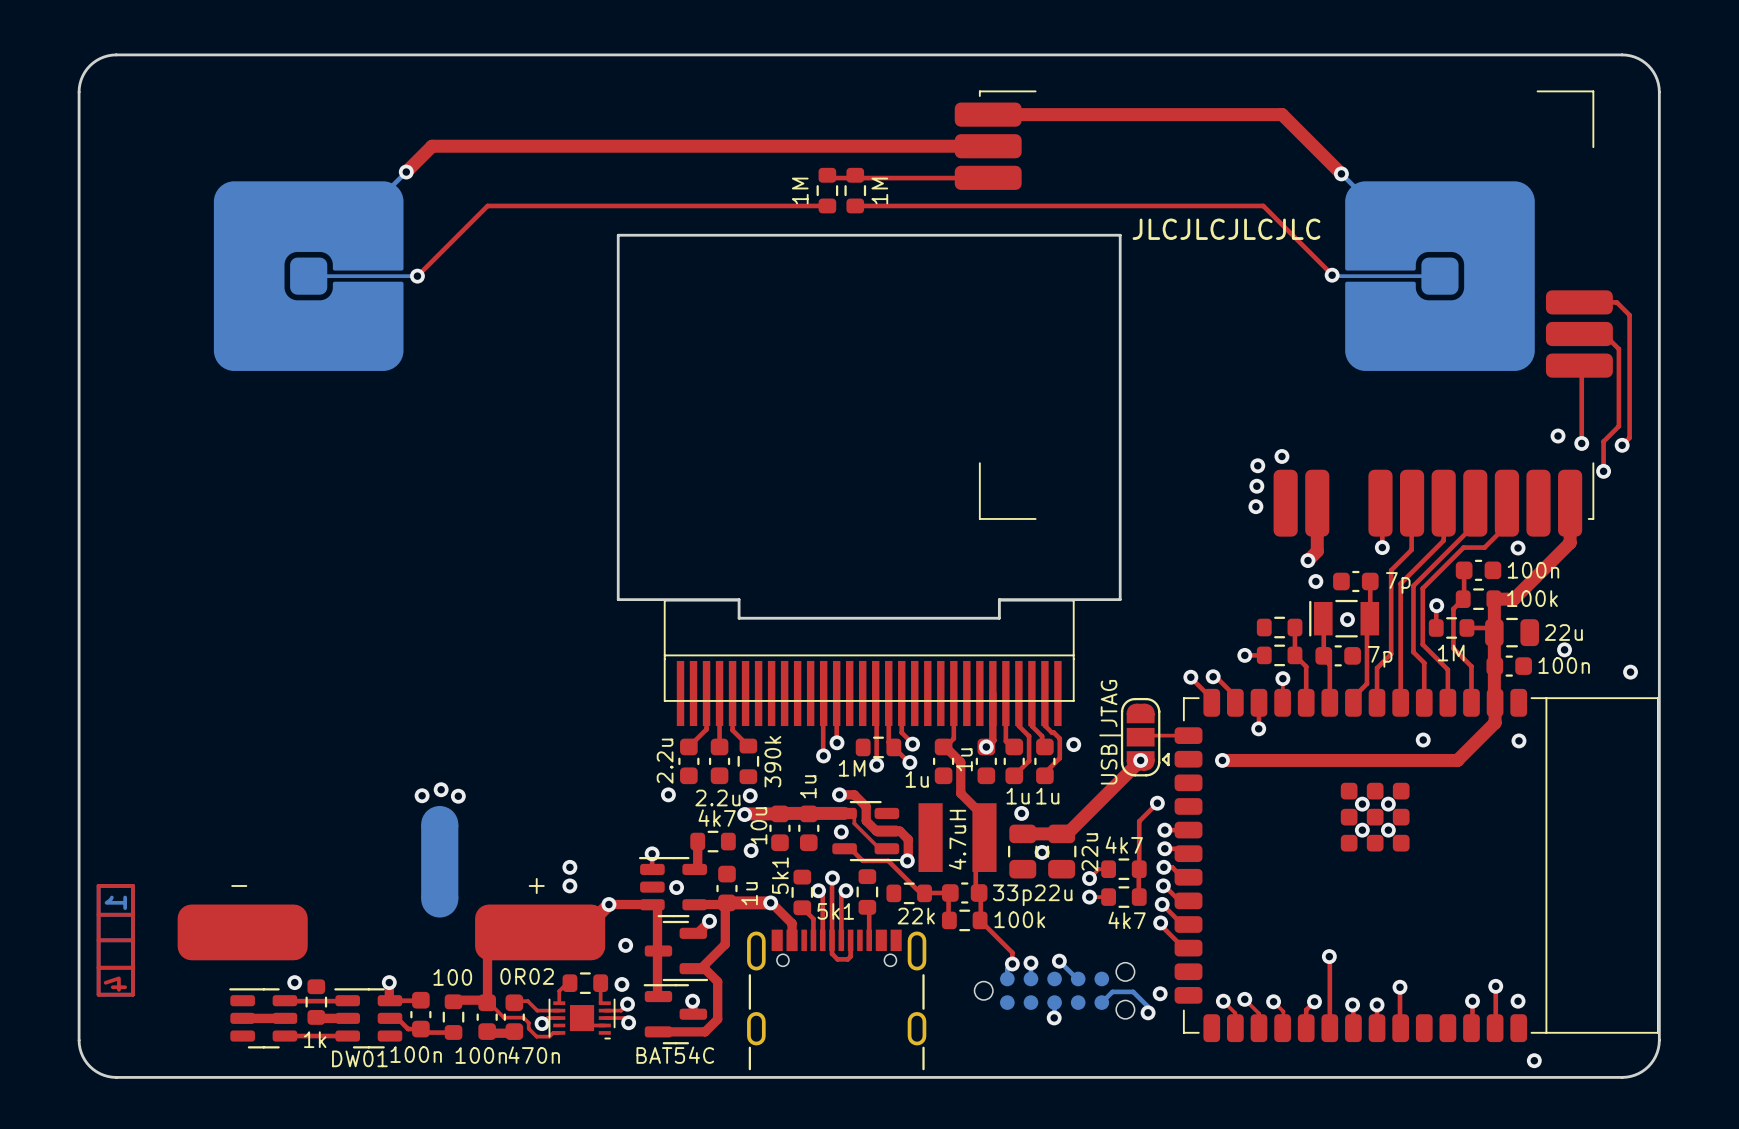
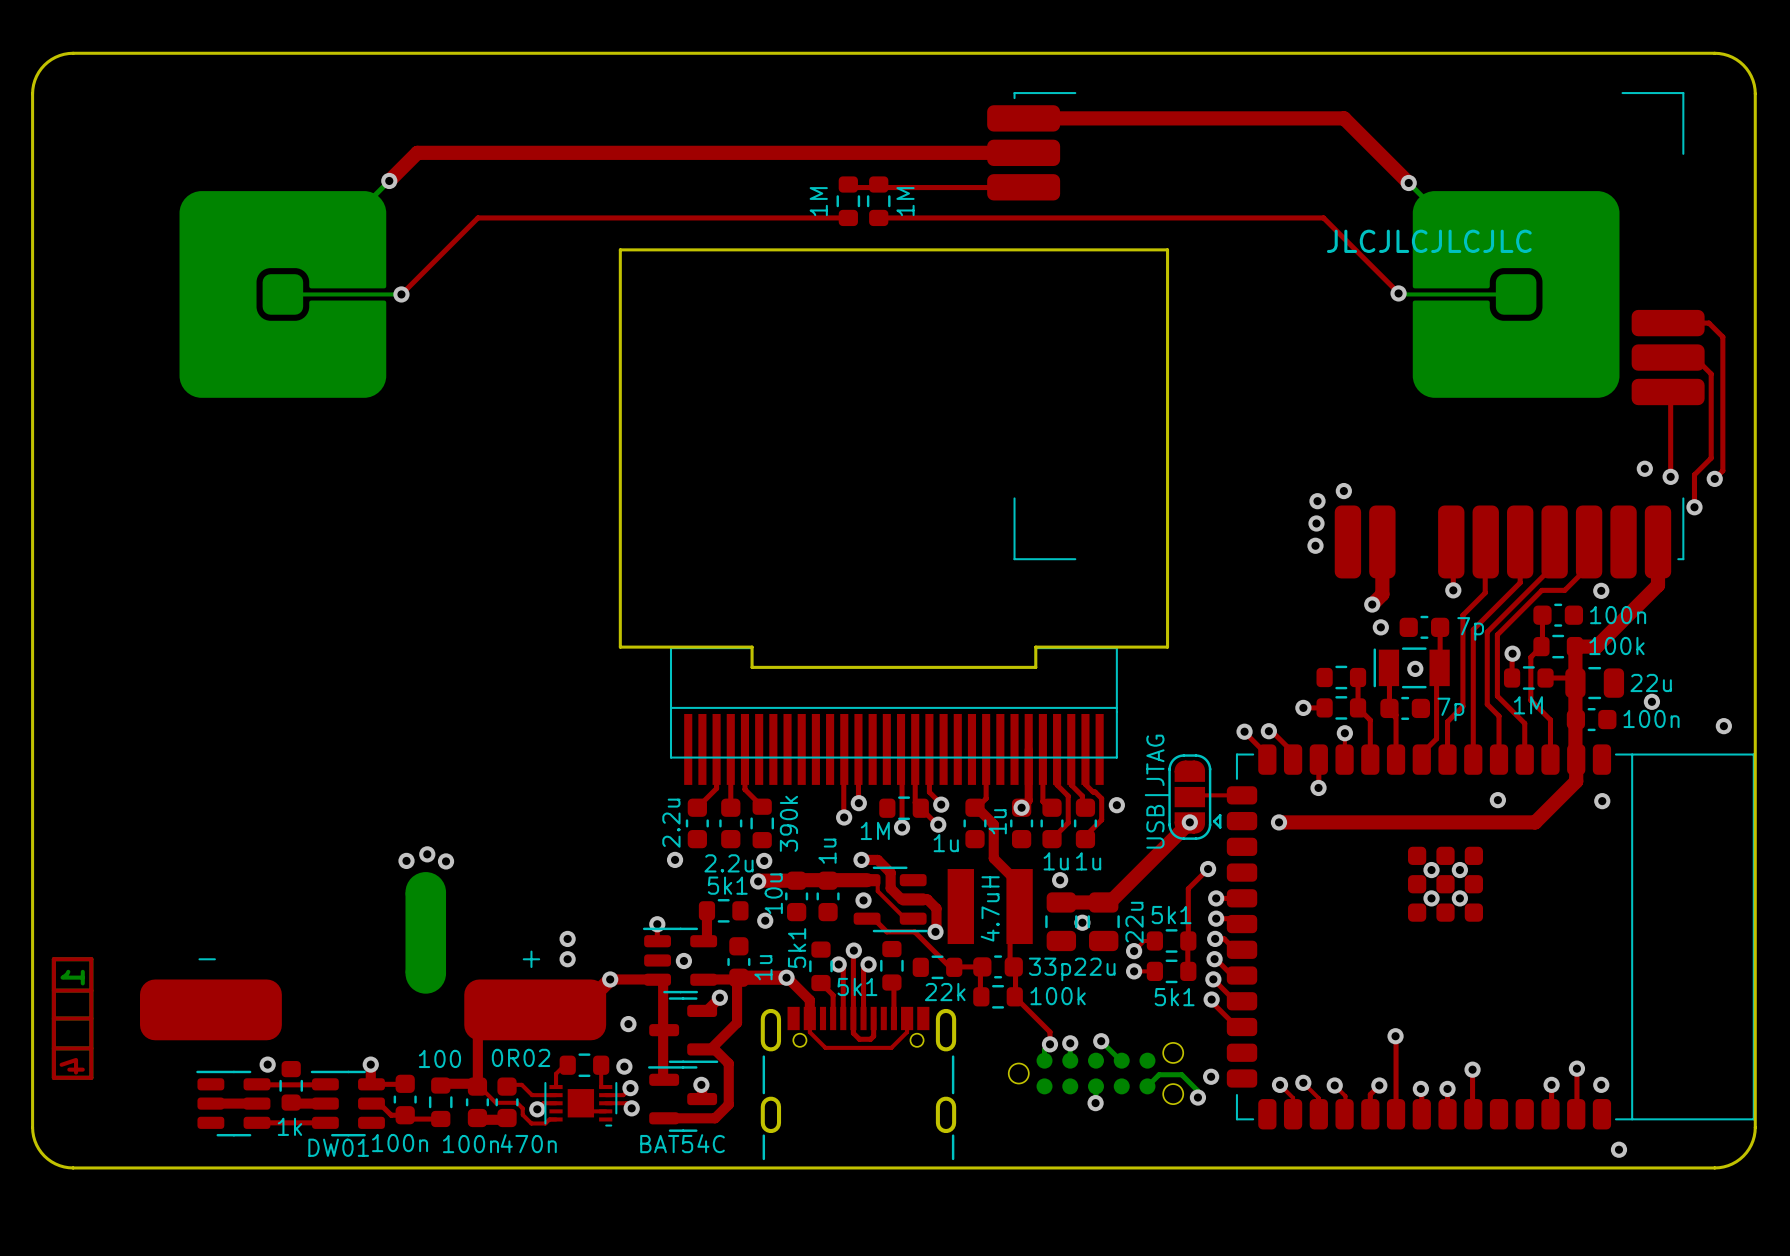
text position: JLCJLCJLCJLC (1226, 229) -> JLCJLCJLCJLC (1429, 241)
part value: 4k7 (717, 818) -> 5k1 (727, 885)
part value: 4k7 (1124, 845) -> 5k1 (1171, 915)
part value: 4k7 (1127, 920) -> 5k1 (1174, 997)
top track: none -> (809, 1018) (809, 1032) (825, 1047) (891, 1047) (907, 1032) (907, 1018)

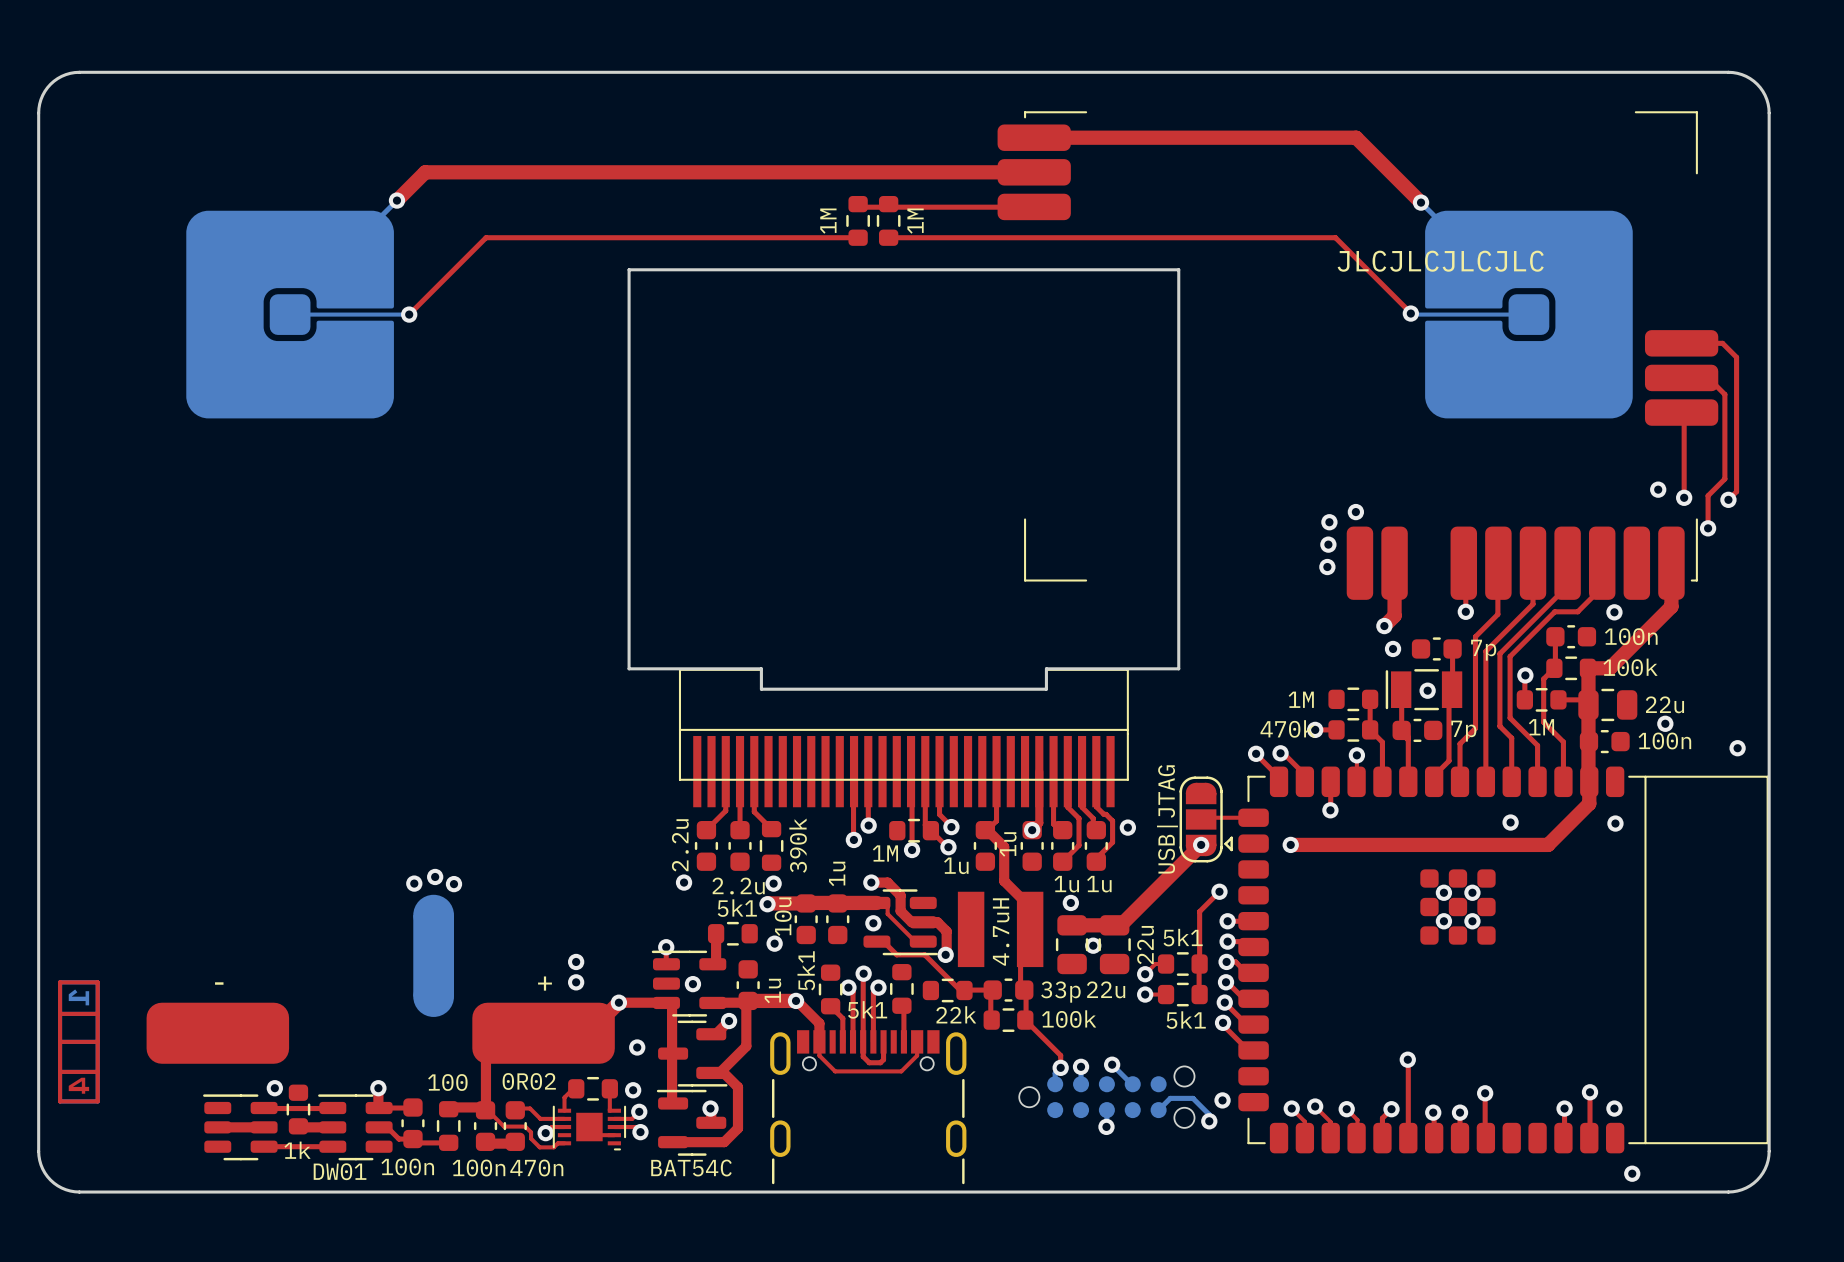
part value: none -> 1M (1301, 699)
part value: none -> 470k (1287, 728)

